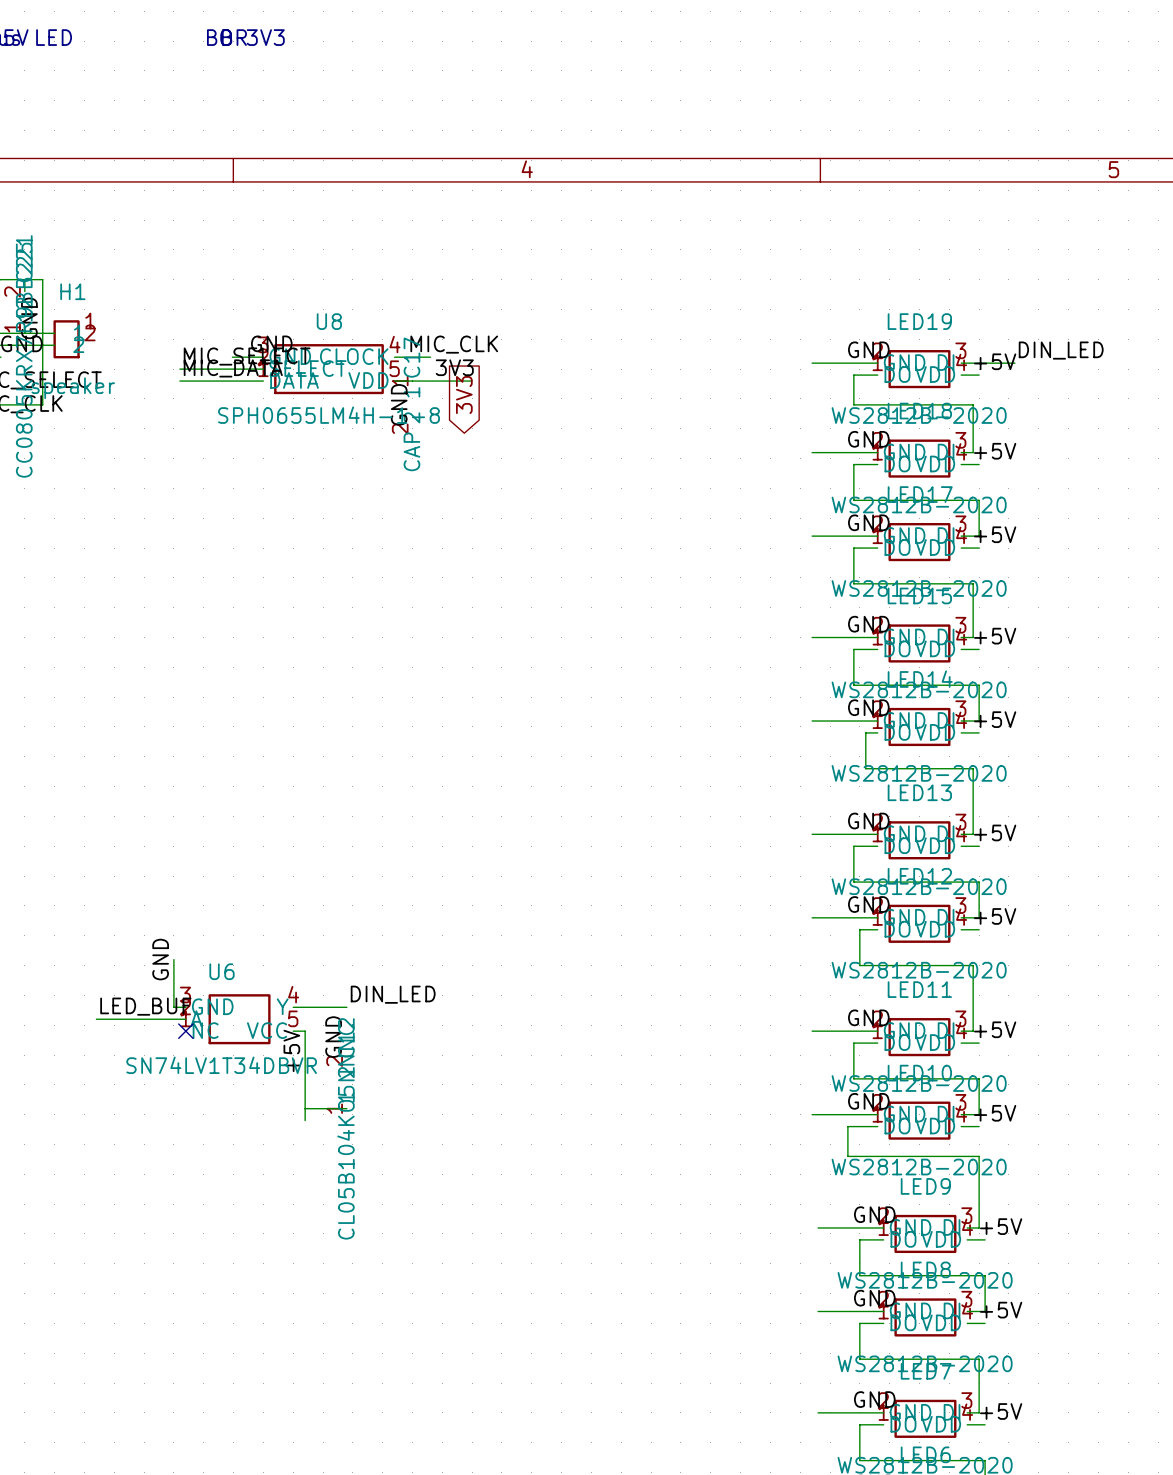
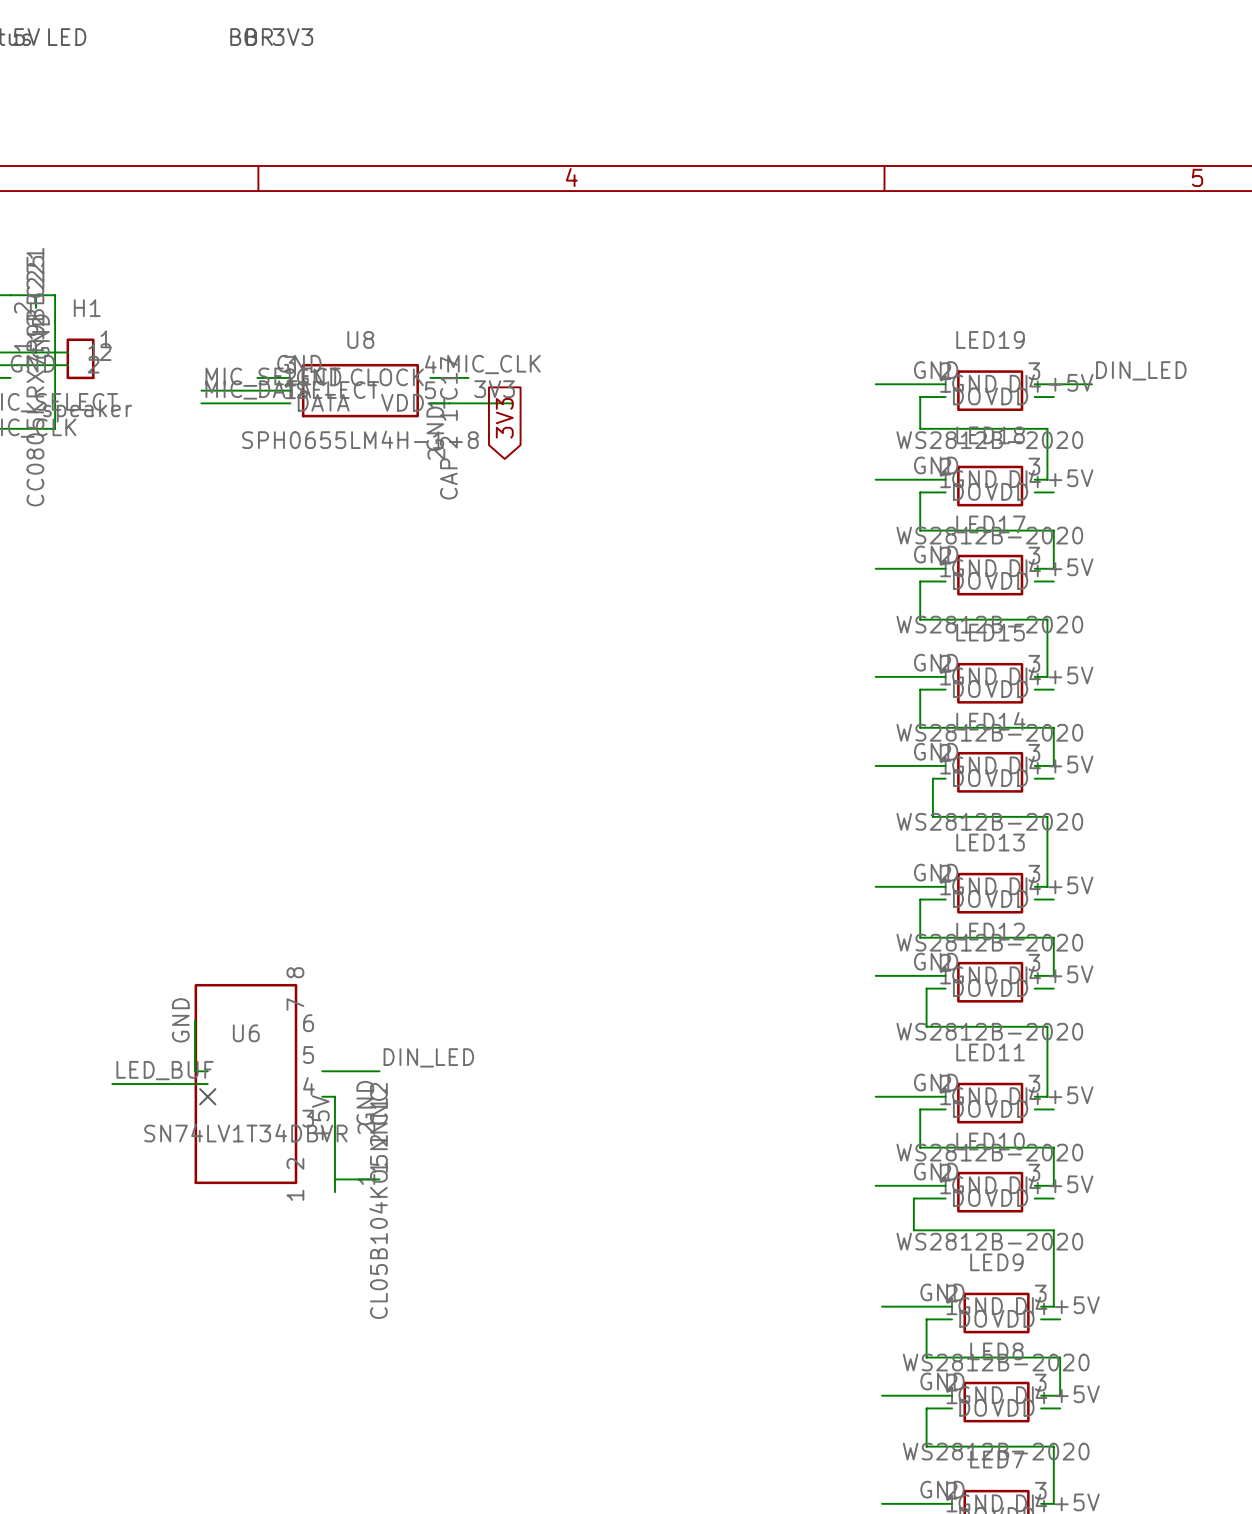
U6 symbol: [208, 994, 271, 1045] -> [194, 983, 298, 1185]

